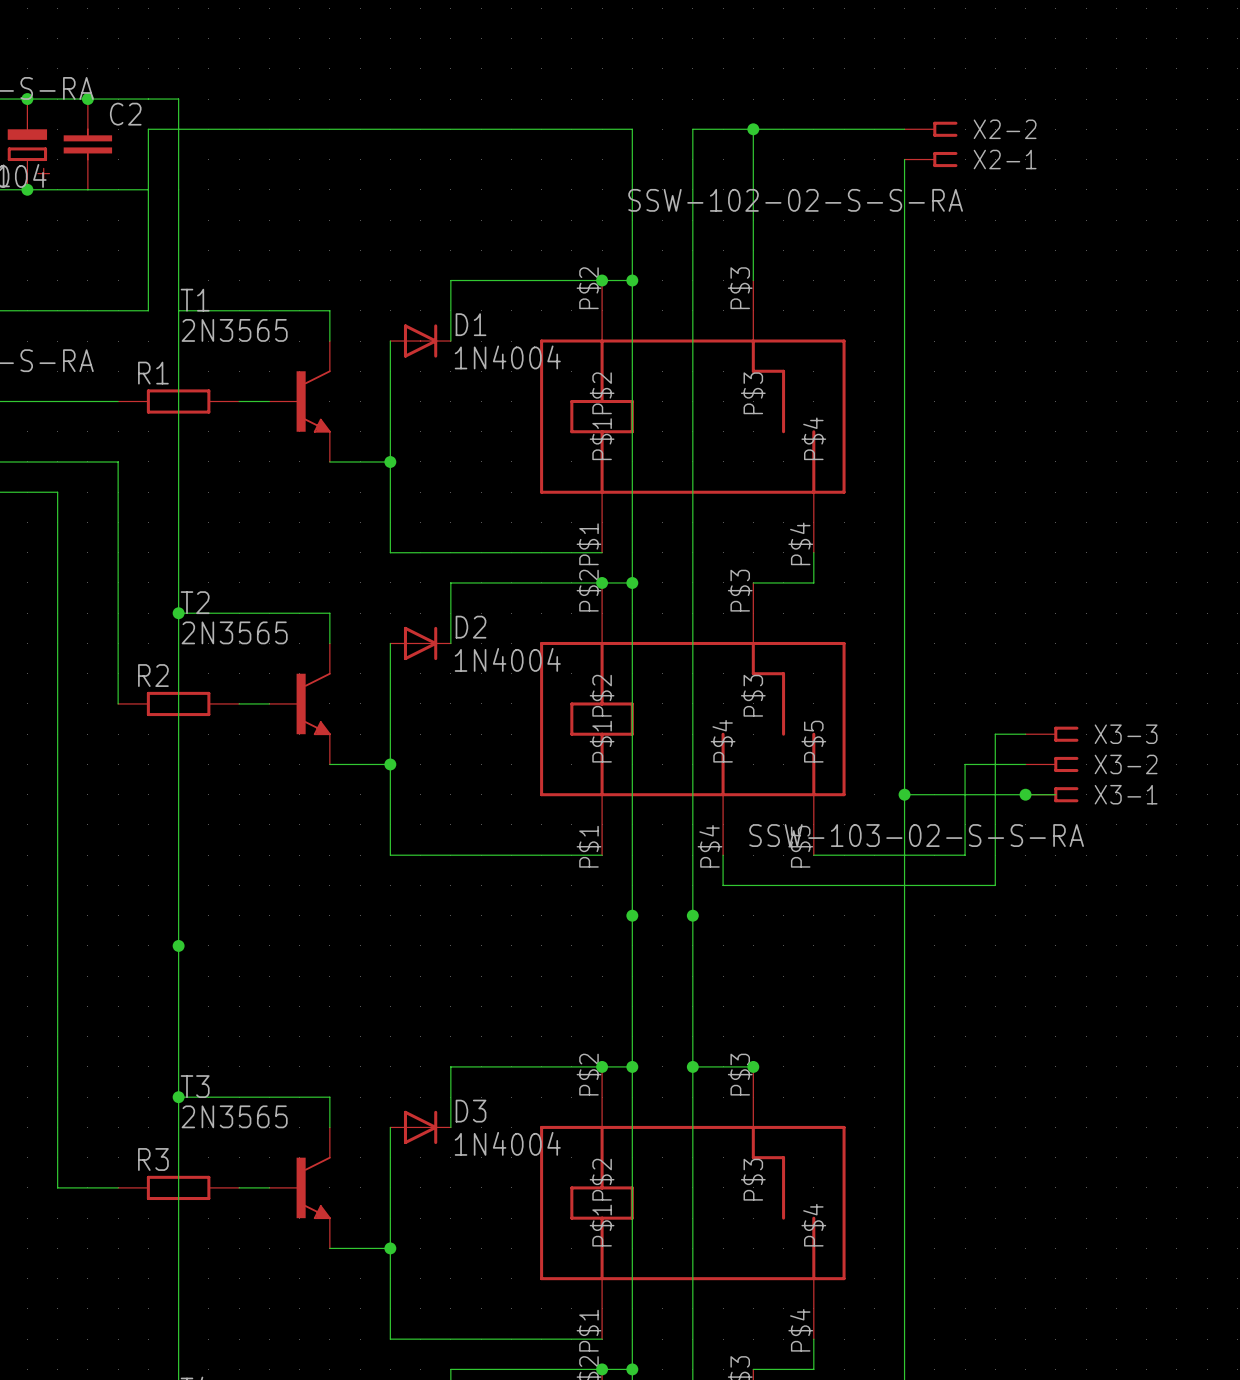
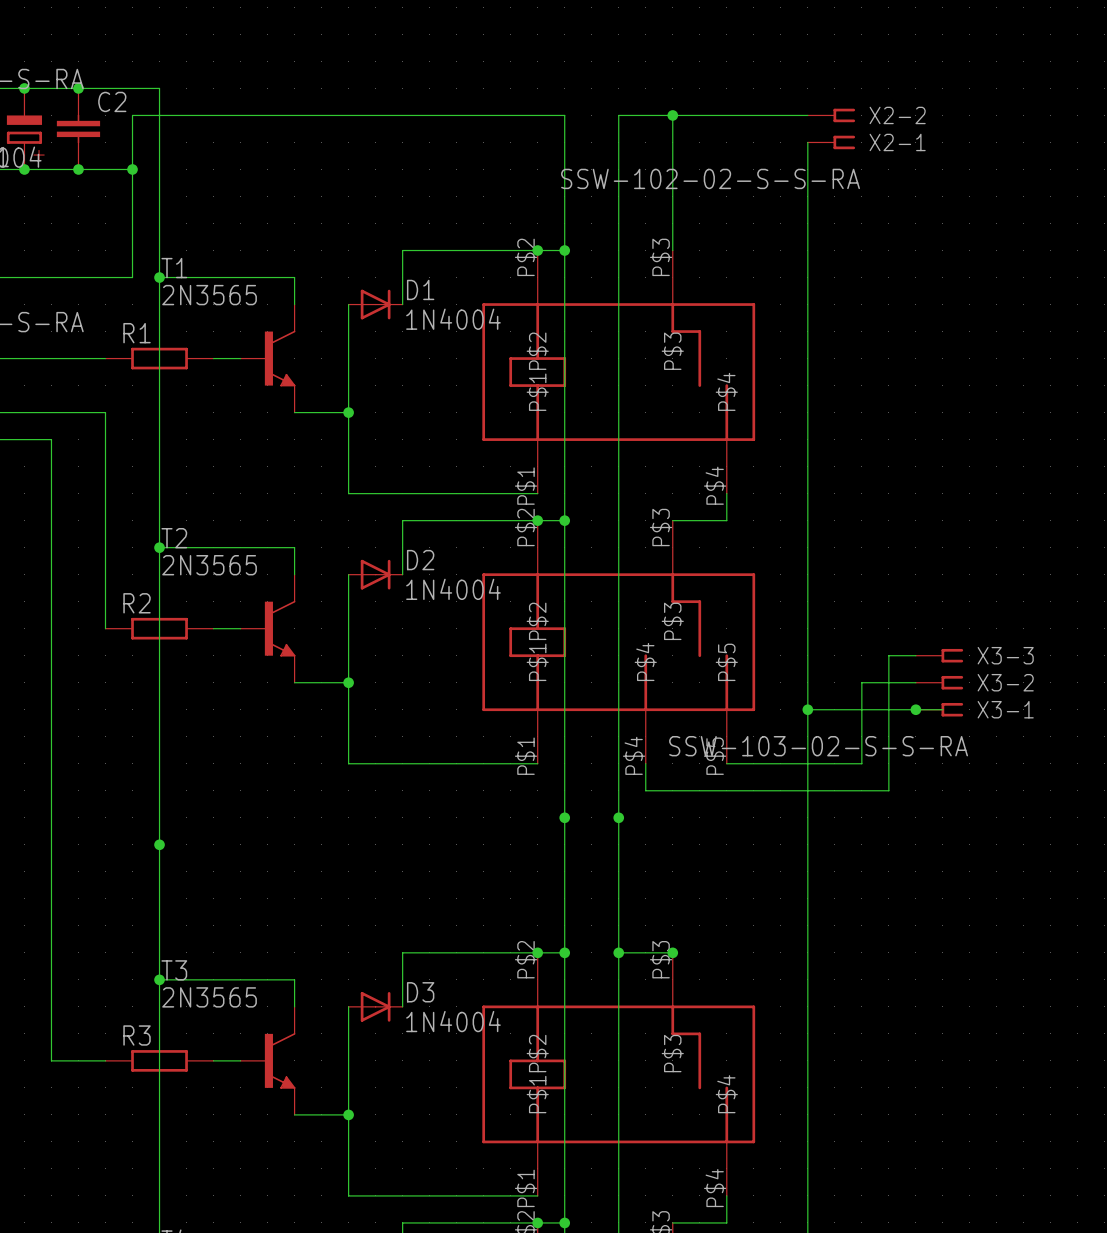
junction: none -> (78, 169)
junction: none -> (132, 169)
junction: none -> (159, 277)

